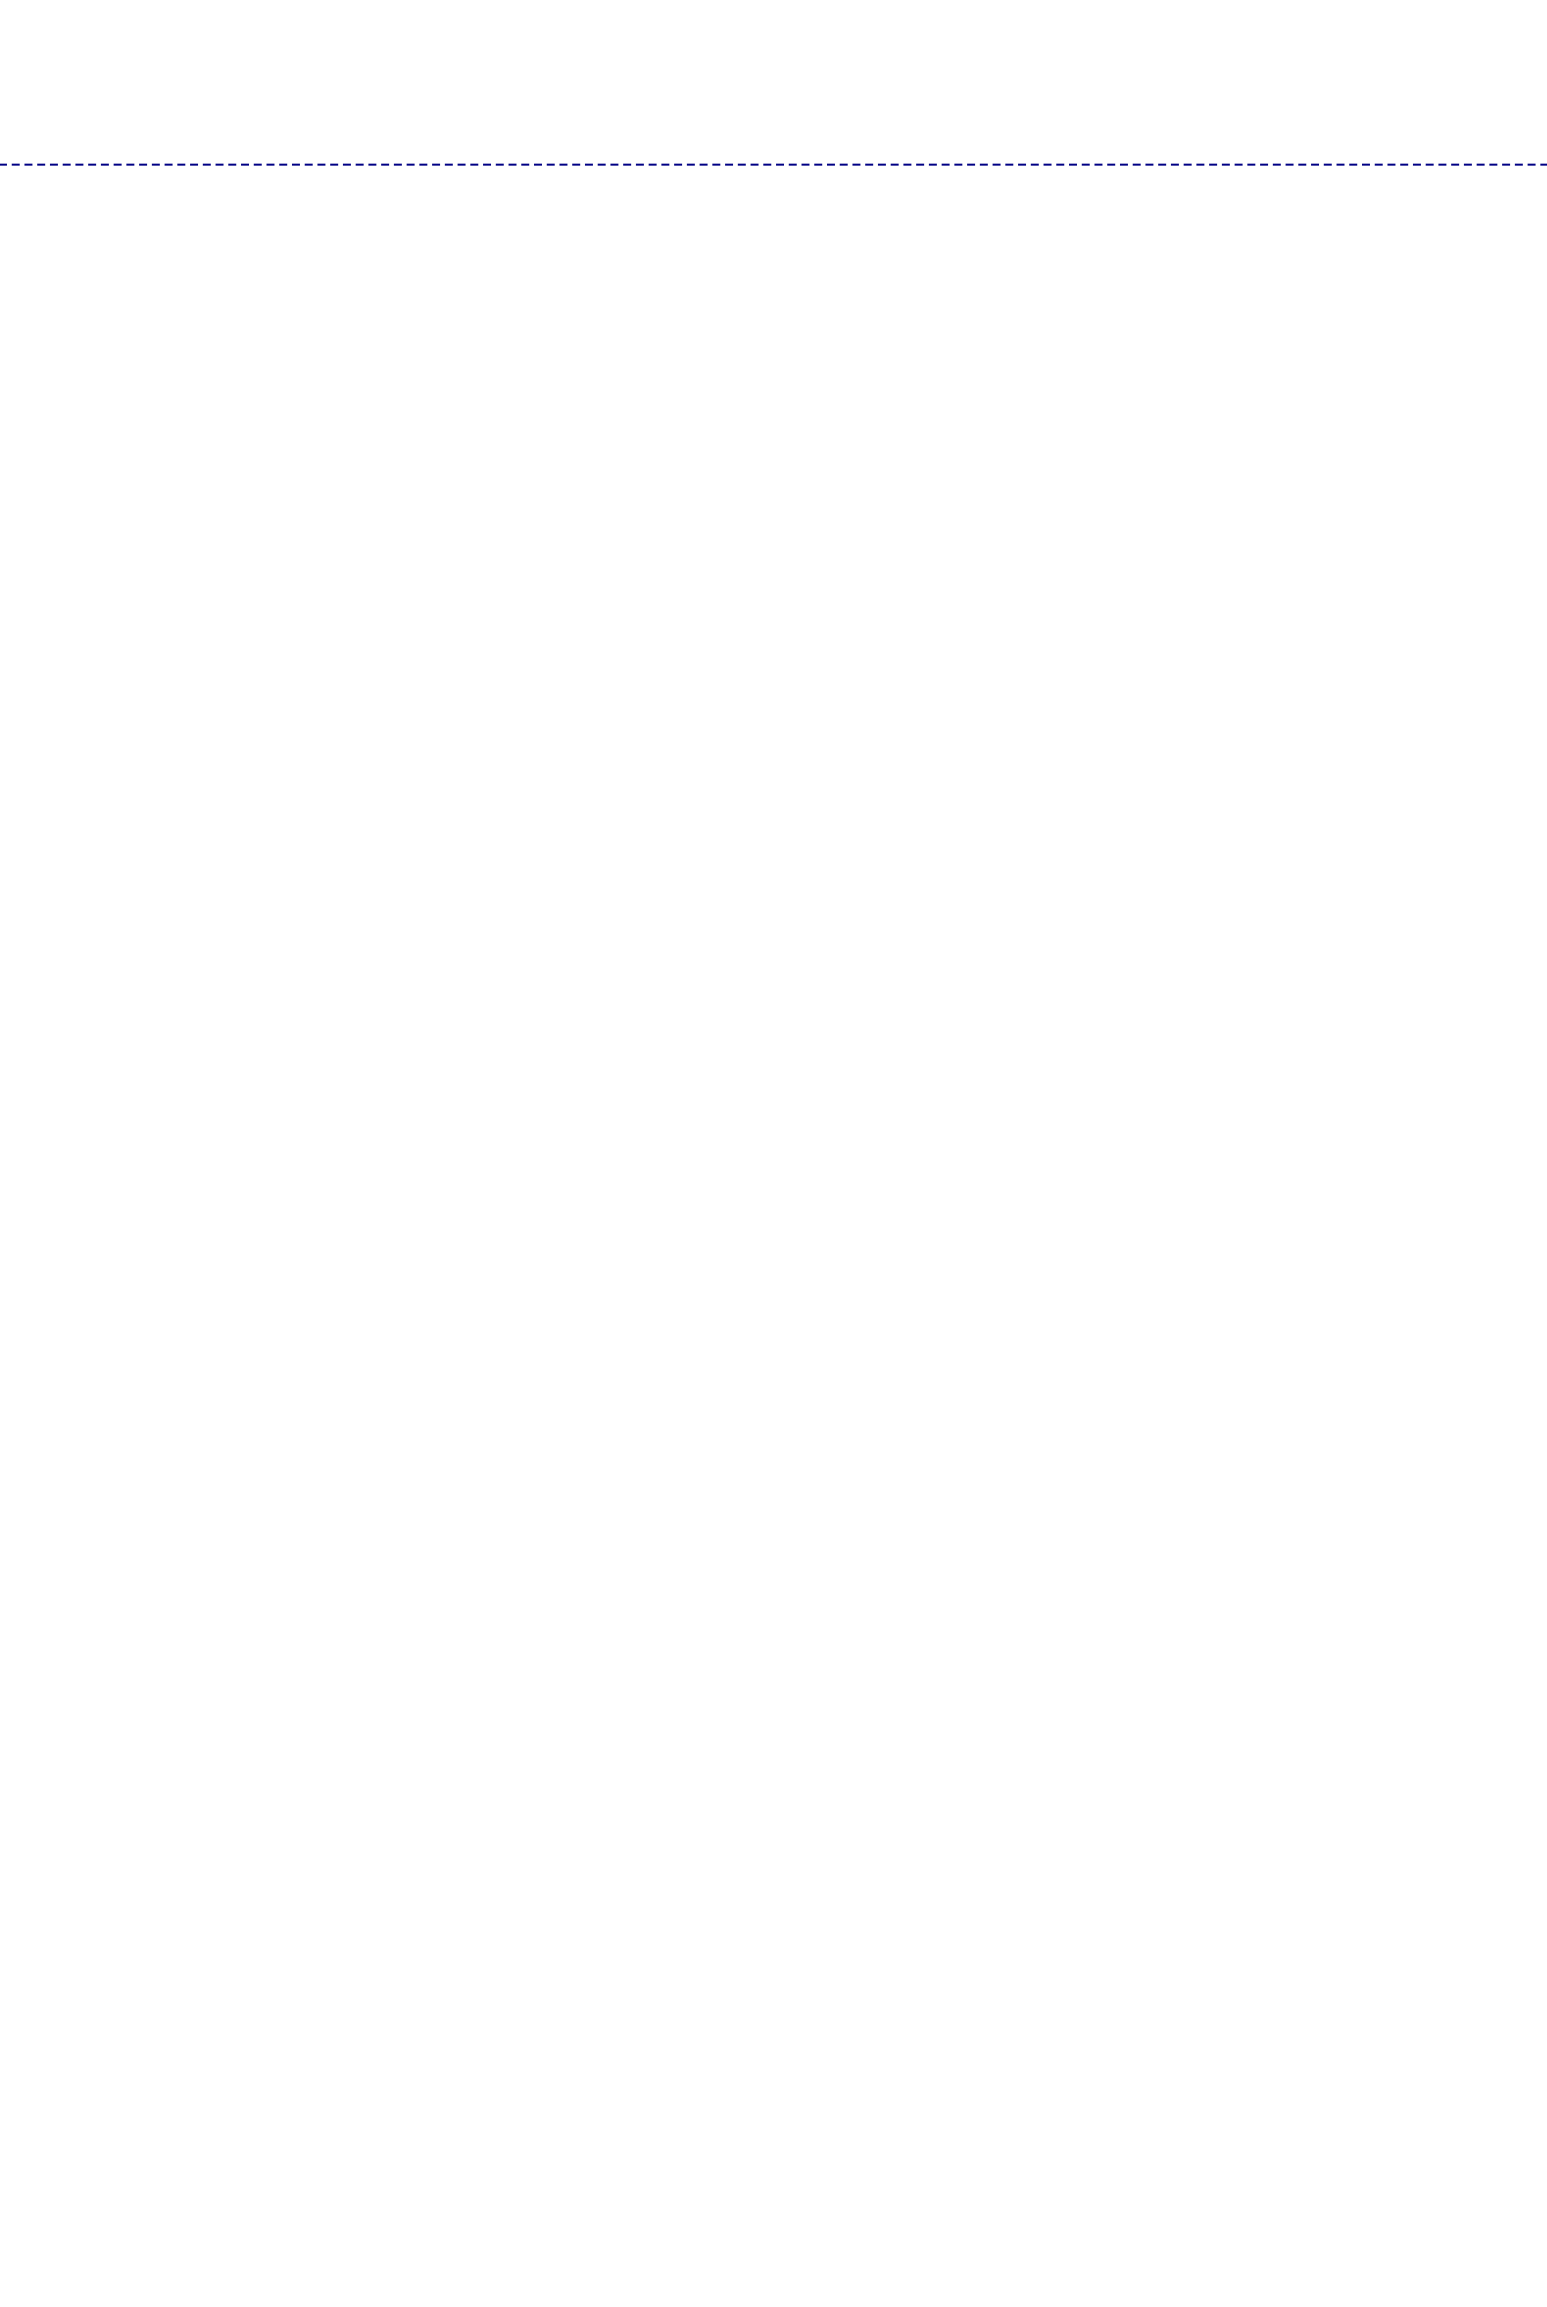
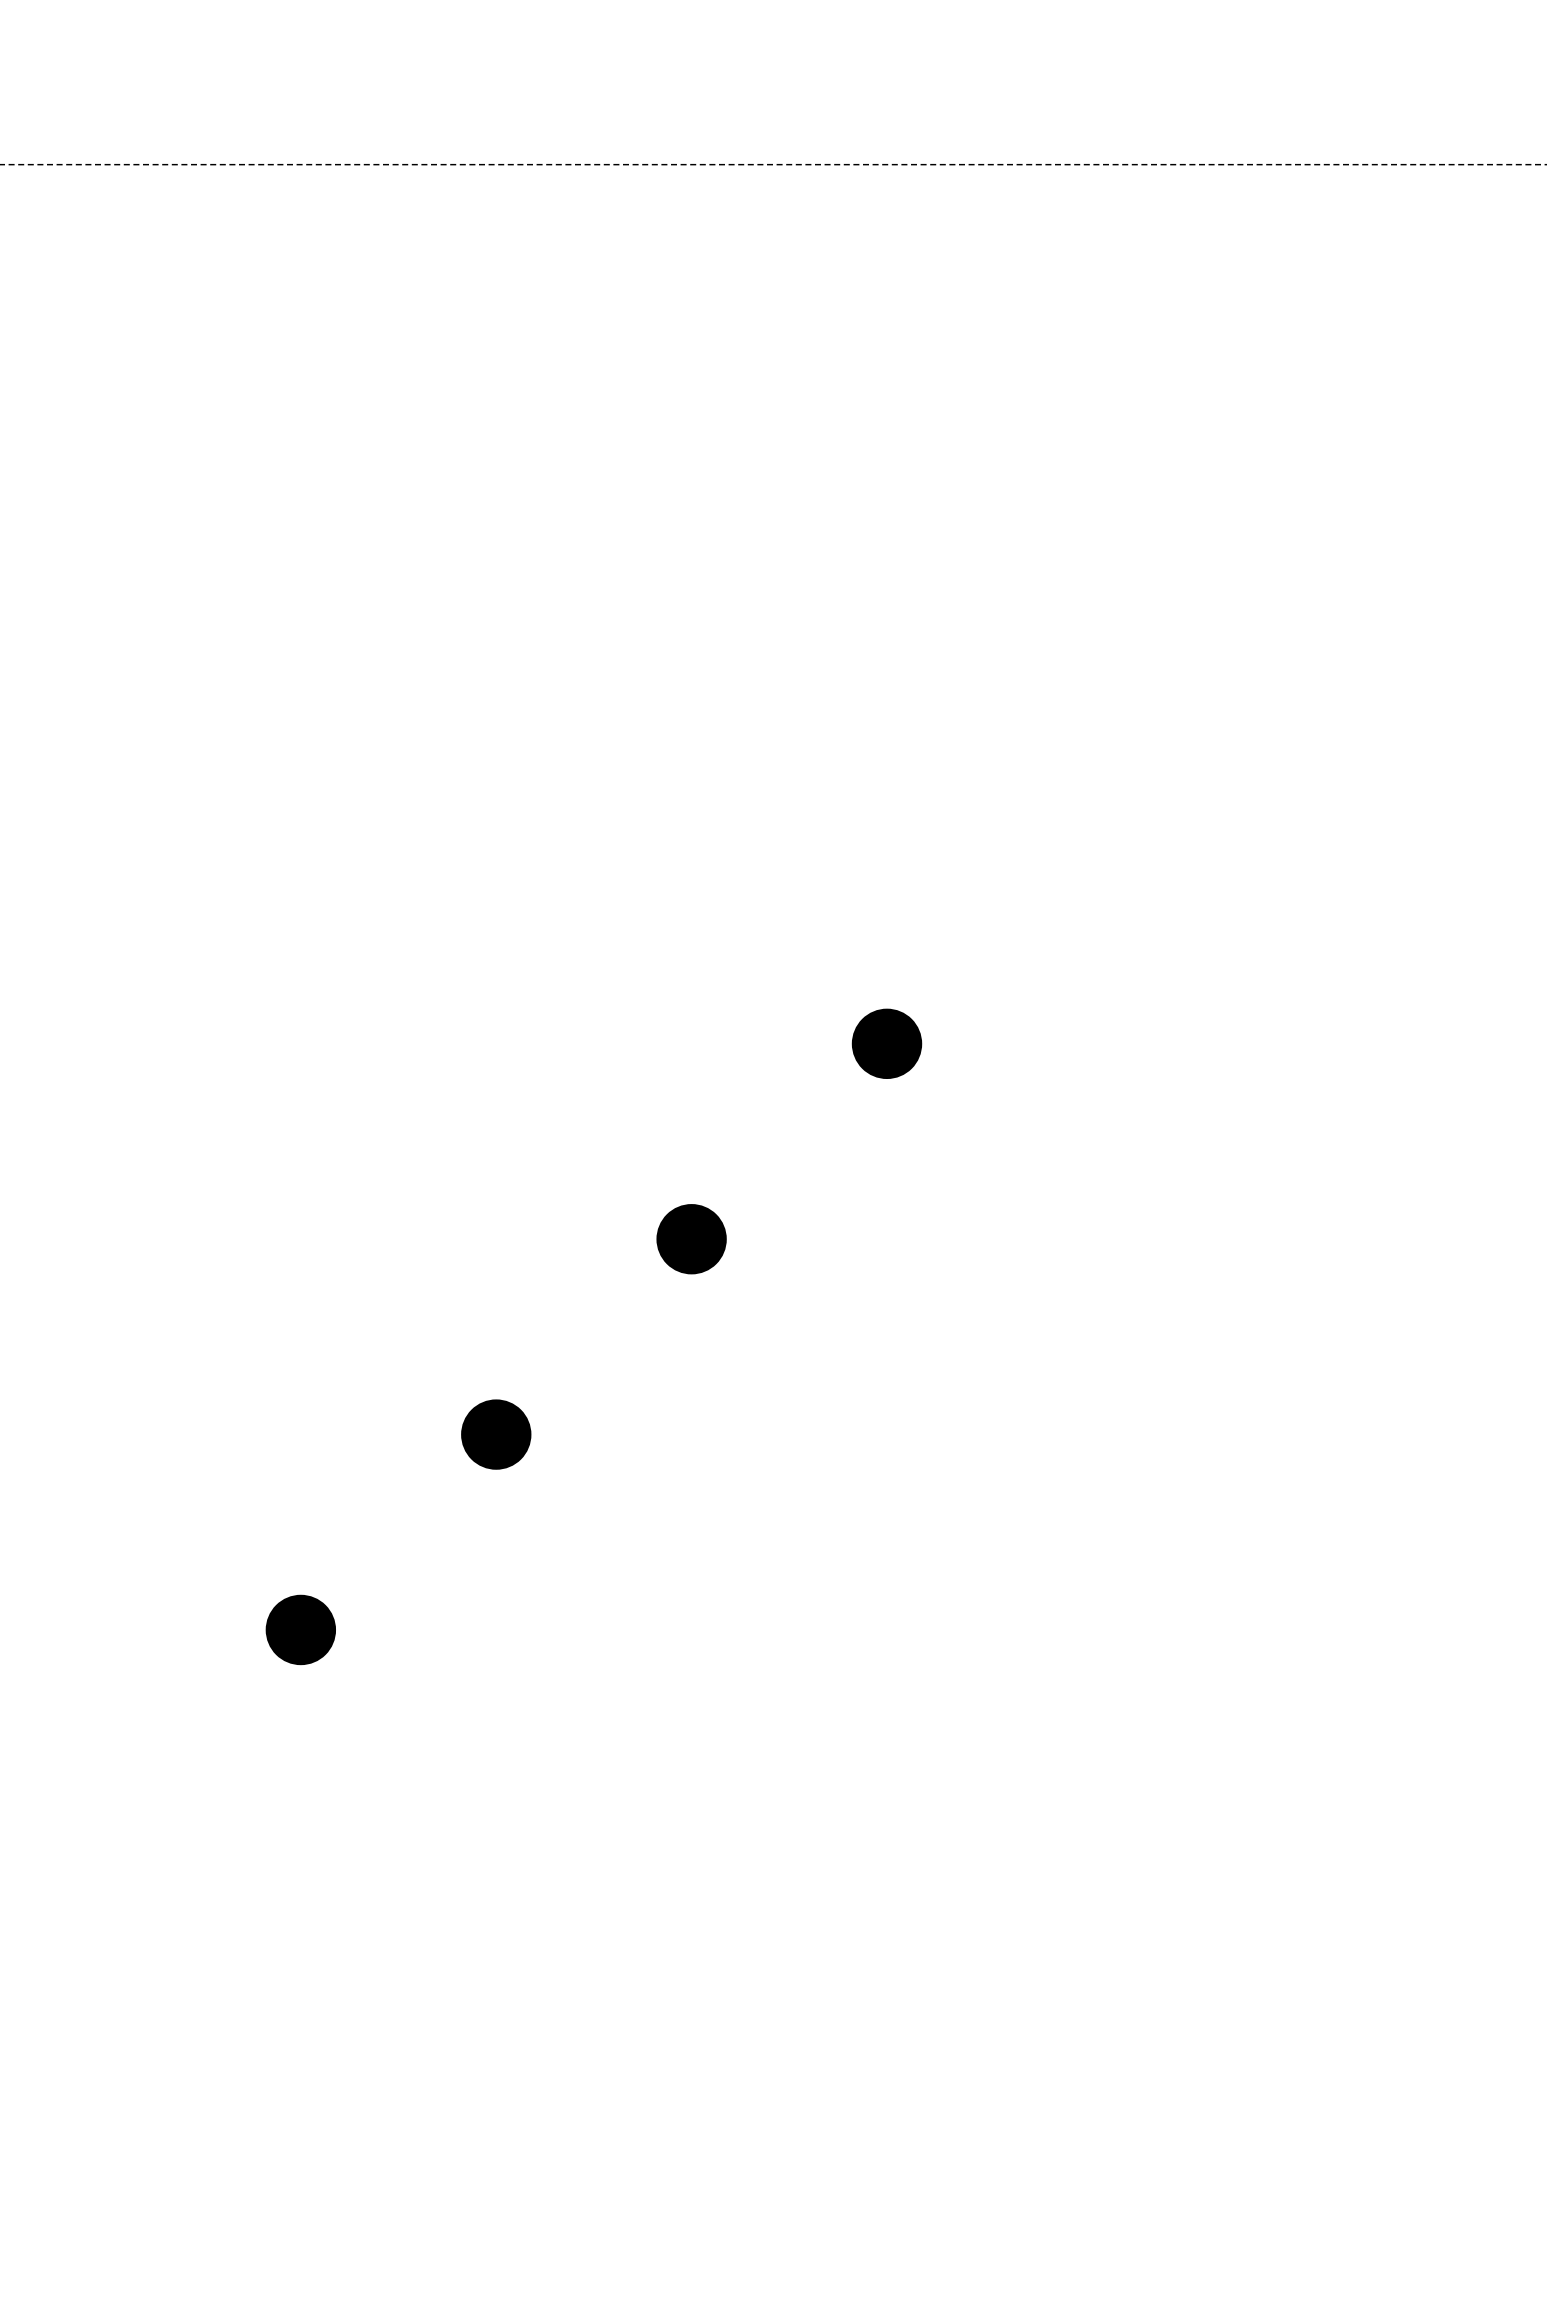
junction: none -> (887, 1043)
junction: none -> (691, 1239)
junction: none -> (496, 1434)
junction: none -> (300, 1629)

